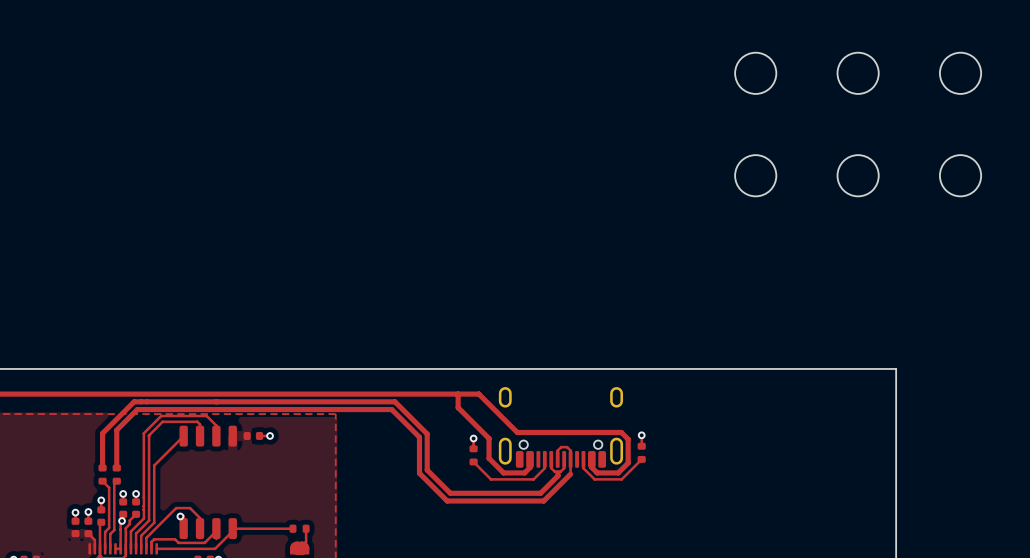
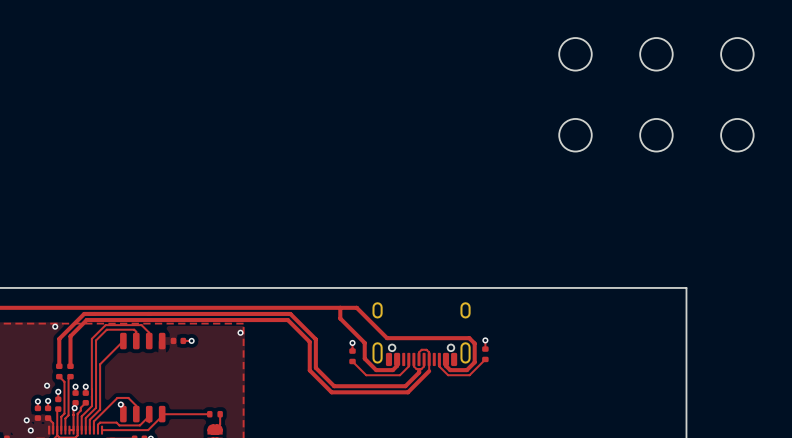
via: none -> (55, 326)
via: none -> (240, 332)
via: none -> (47, 385)
via: none -> (26, 420)
via: none -> (30, 430)

